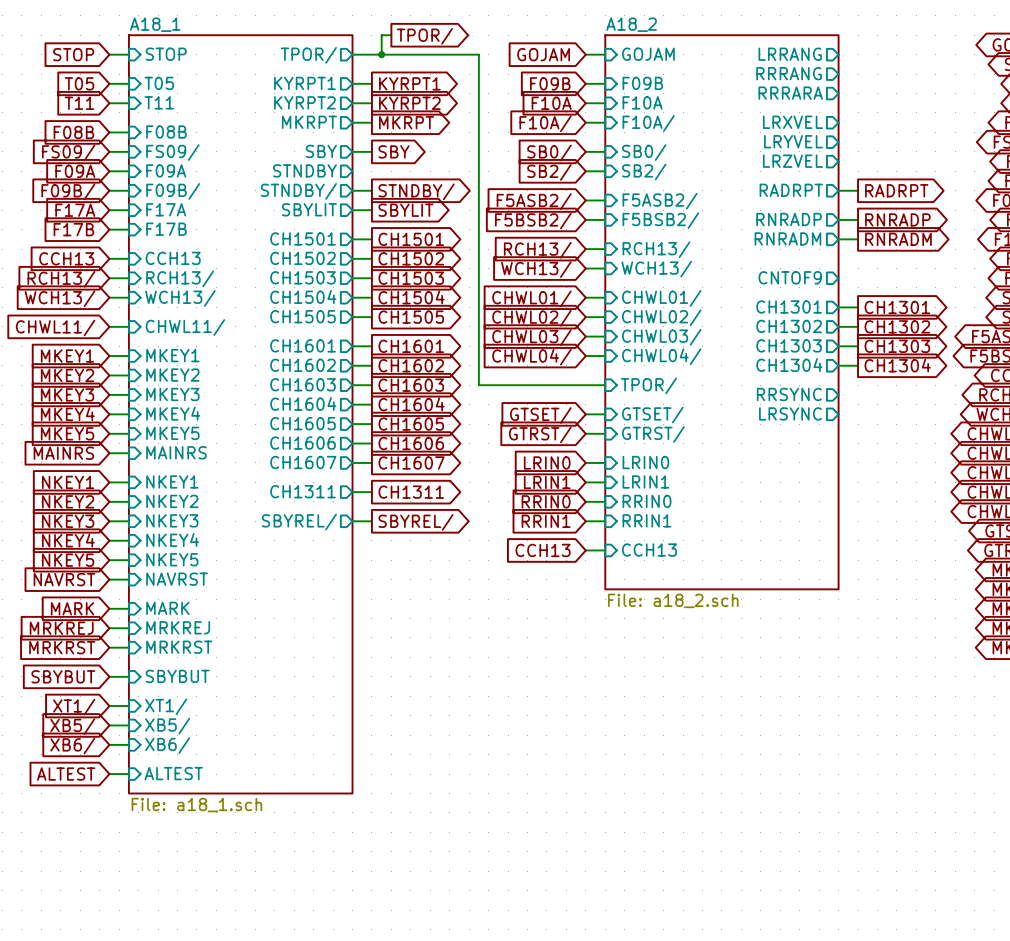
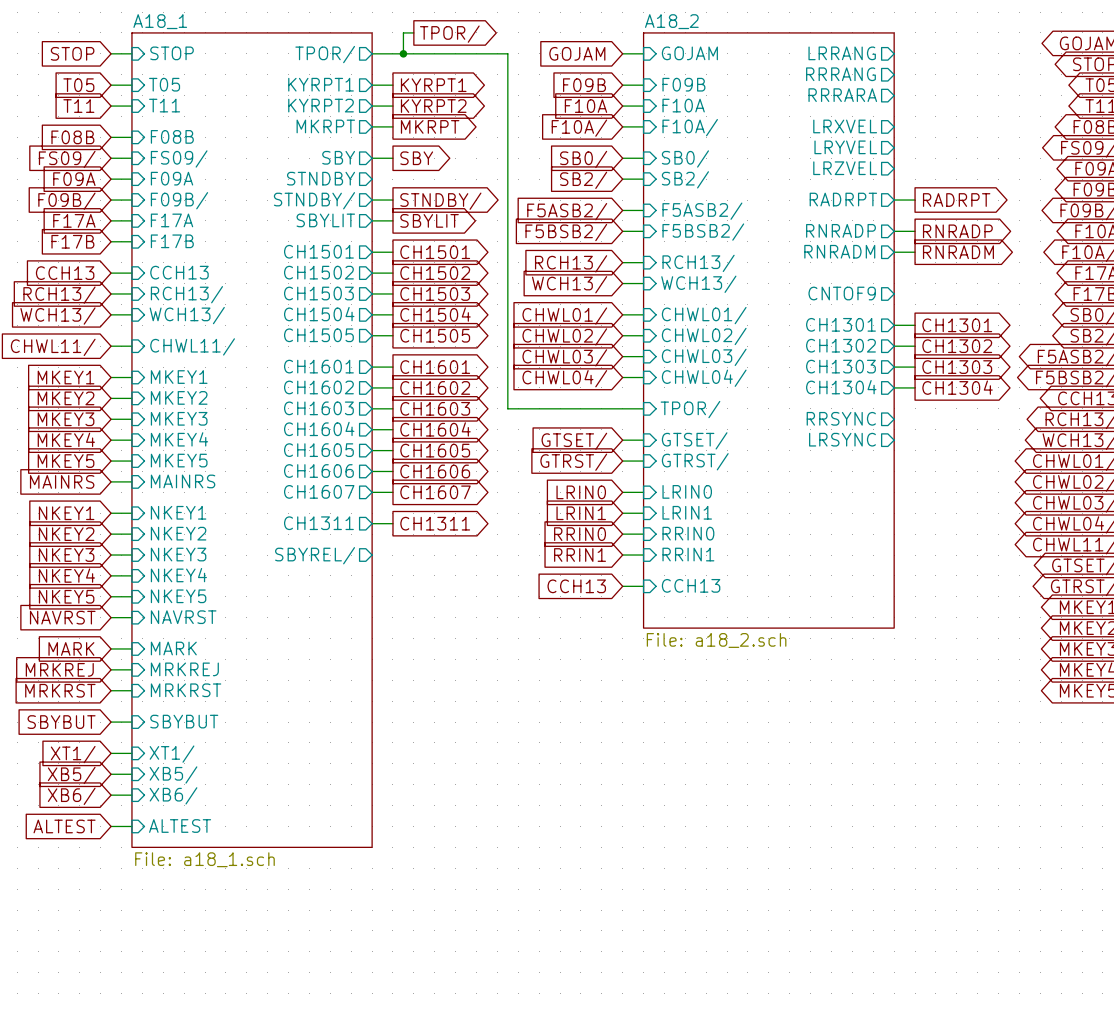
wire: (352, 521) (371, 521) -> none
global label: SBYREL/ (415, 522) -> none

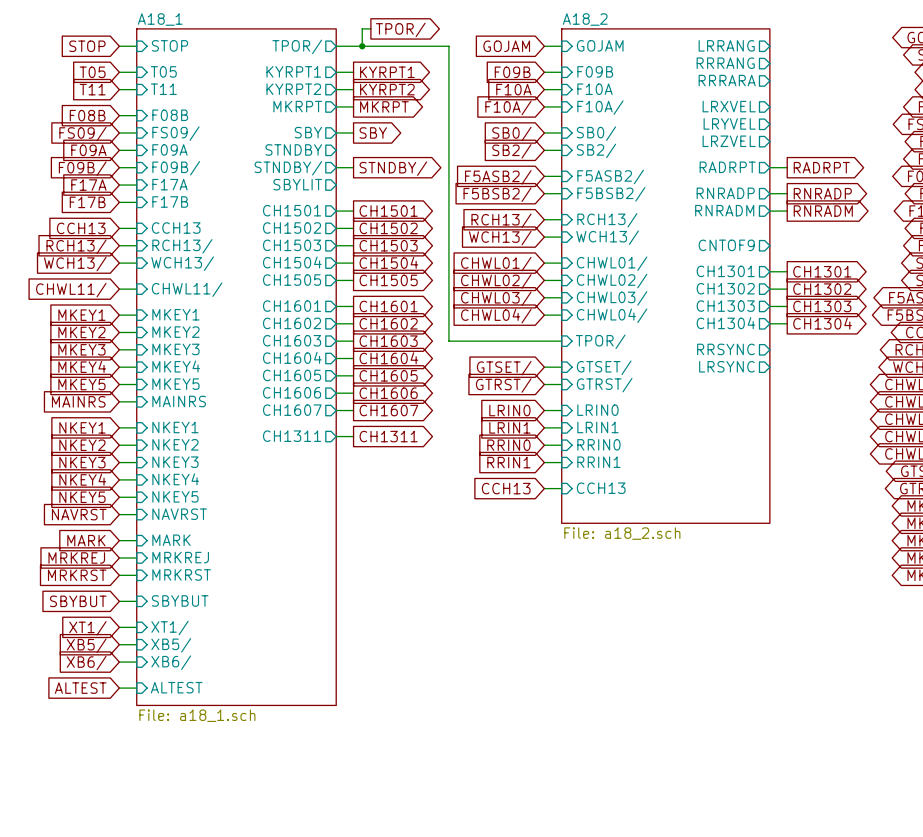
wire: (372, 220) (392, 220) -> none
global label: SBYLIT (429, 220) -> none
sheet pin: SBYREL/ (315, 555) -> none

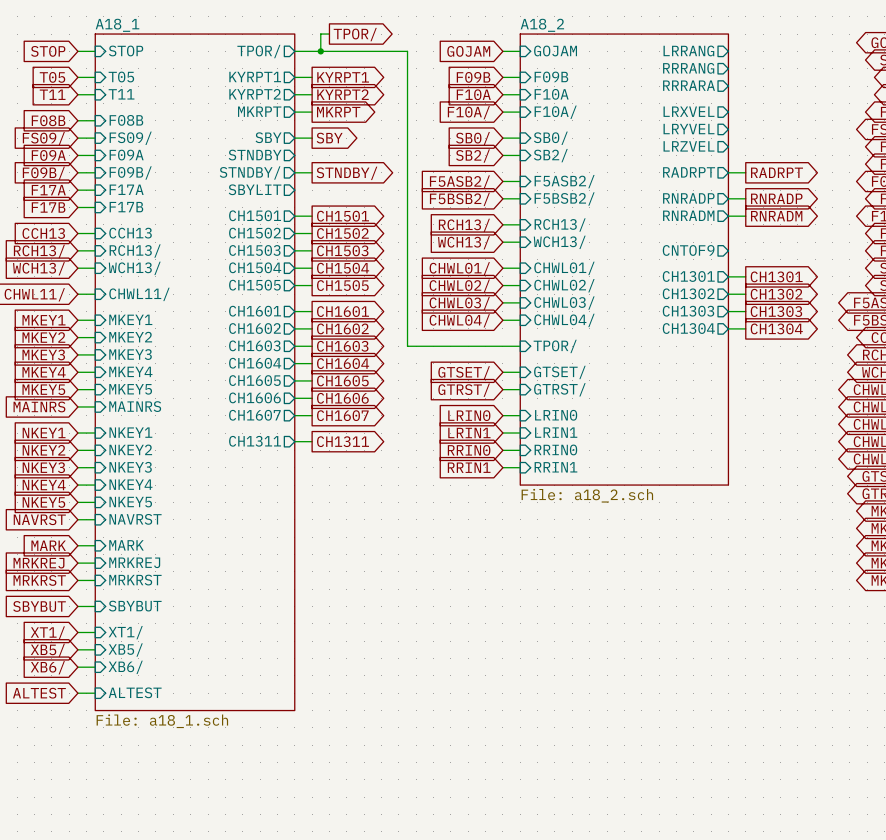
sheet A18_2 shape: [561, 28, 770, 524] -> [520, 34, 729, 486]
sheet pin: RRSYNC (725, 349) -> none
sheet pin: LRSYNC (726, 366) -> none
global label: CCH13 (506, 488) -> none
wire: (544, 488) (561, 488) -> none
sheet pin: CCH13 (601, 488) -> none
sheet A18_2 value position: File: a18_2.sch (622, 533) -> File: a18_2.sch (587, 495)

